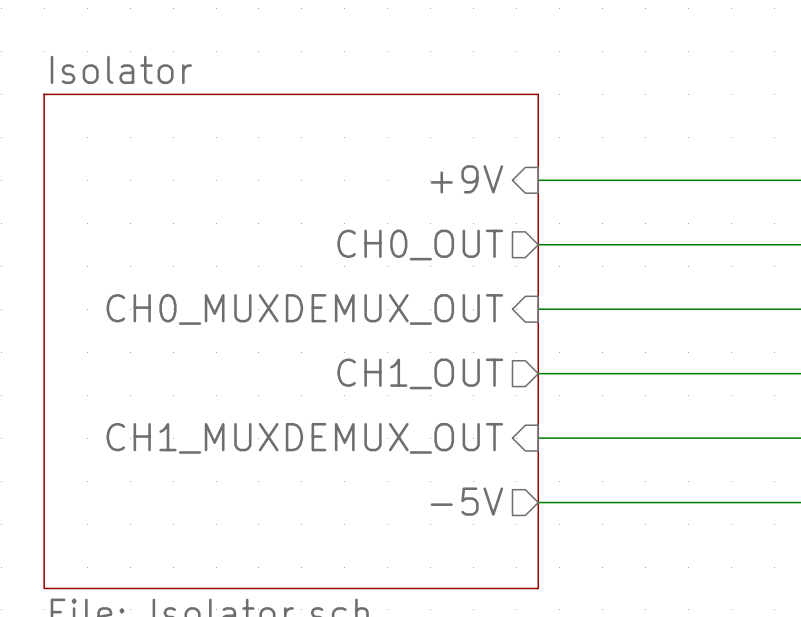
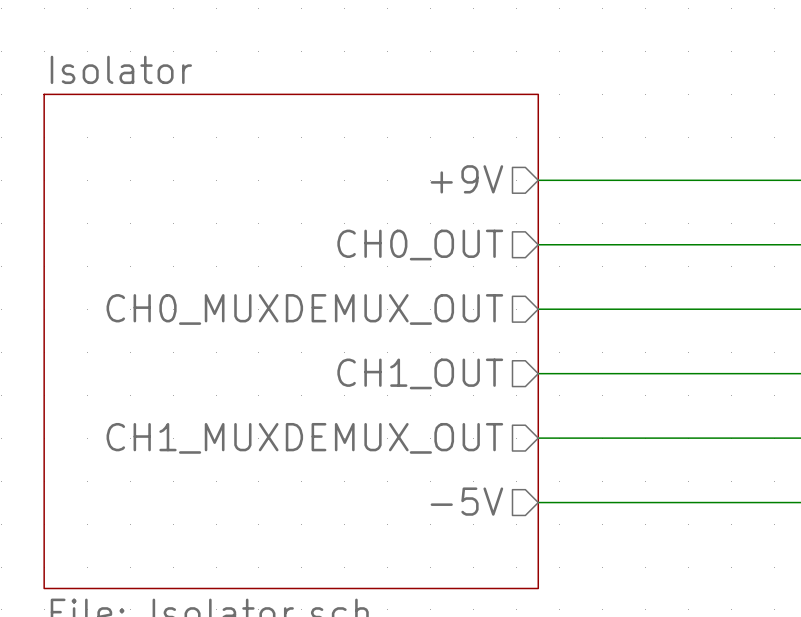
sheet pin shape: input (466, 179) -> output (466, 179)
sheet pin shape: input (304, 309) -> output (304, 309)
sheet pin shape: input (304, 438) -> output (304, 438)

